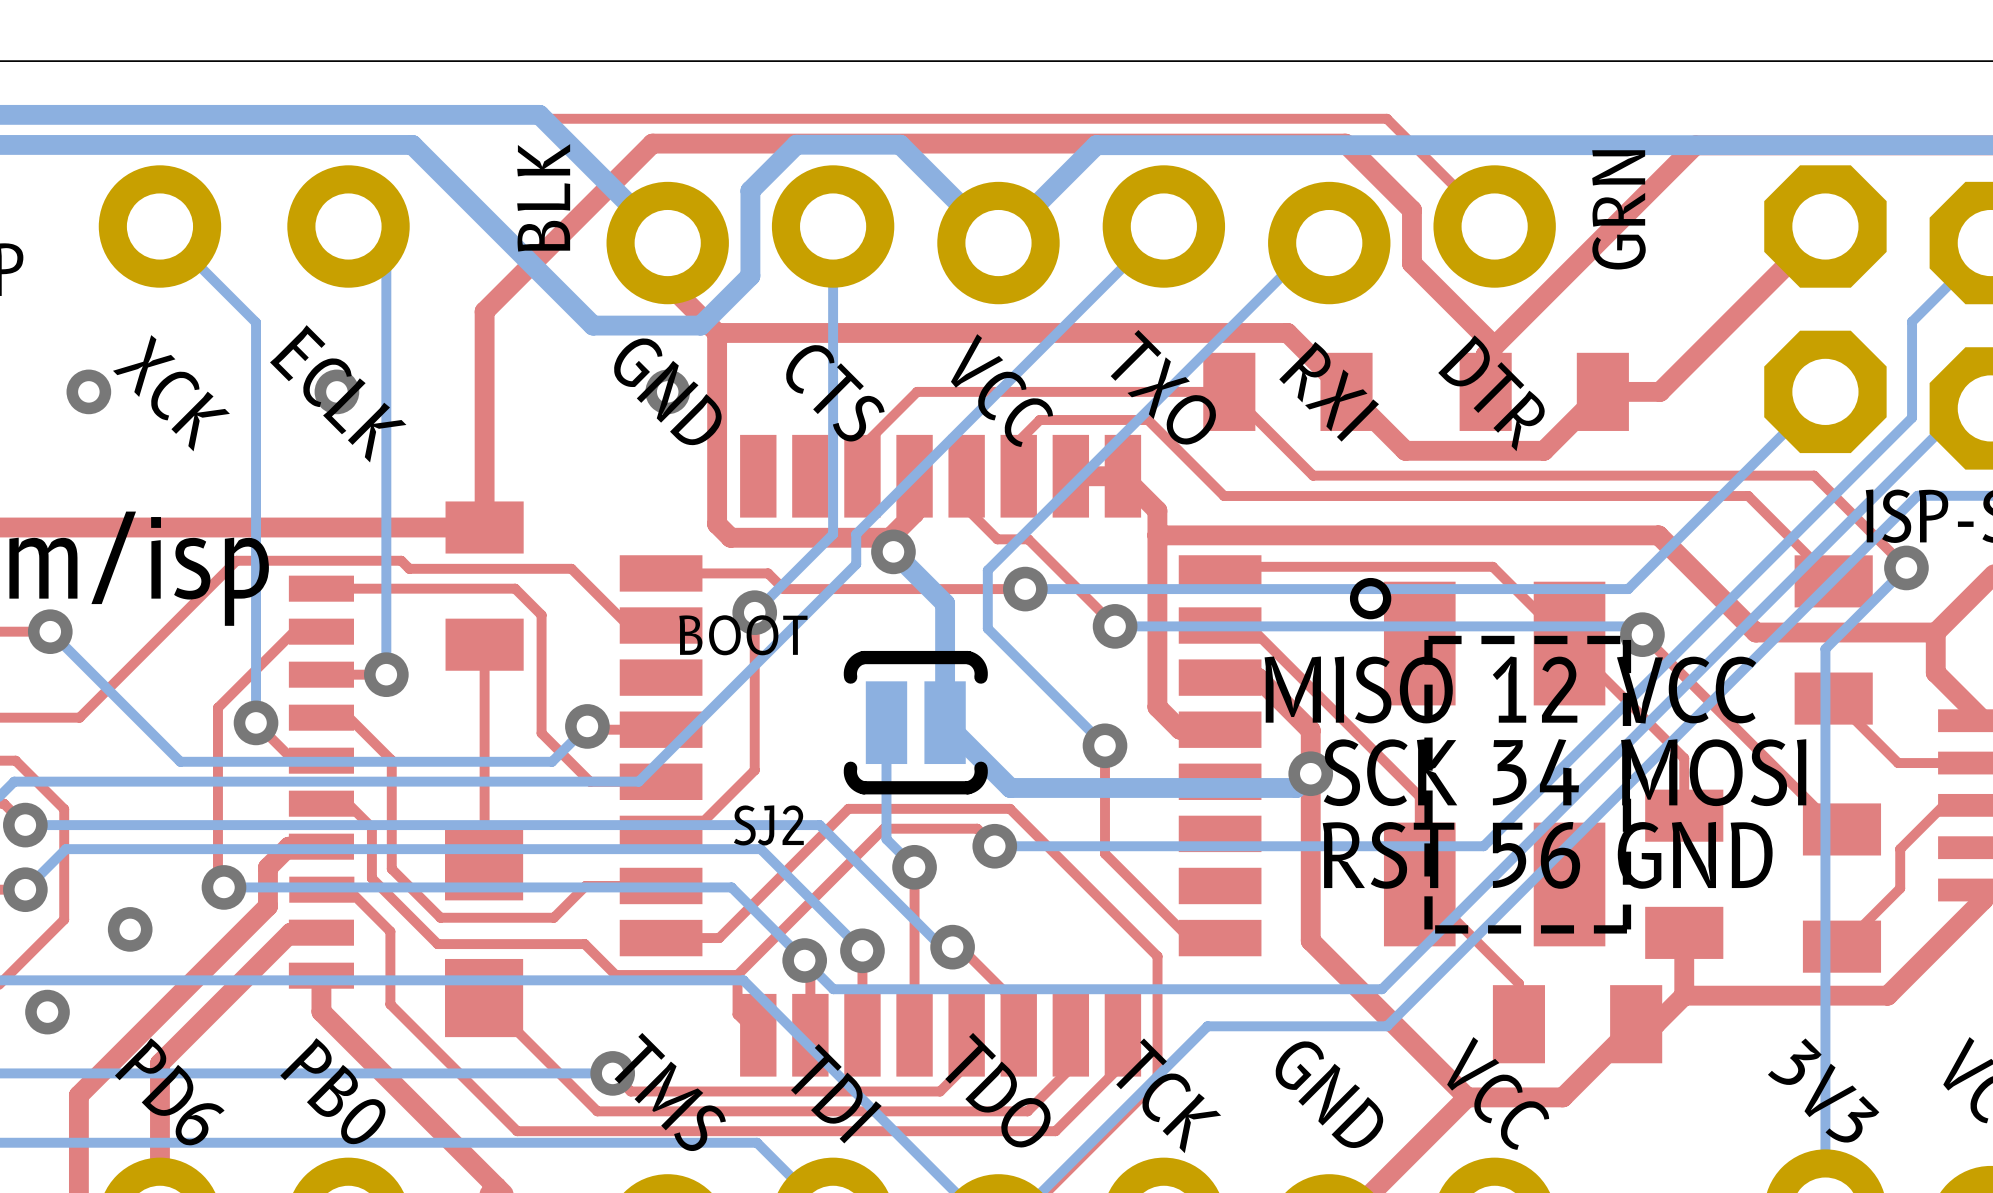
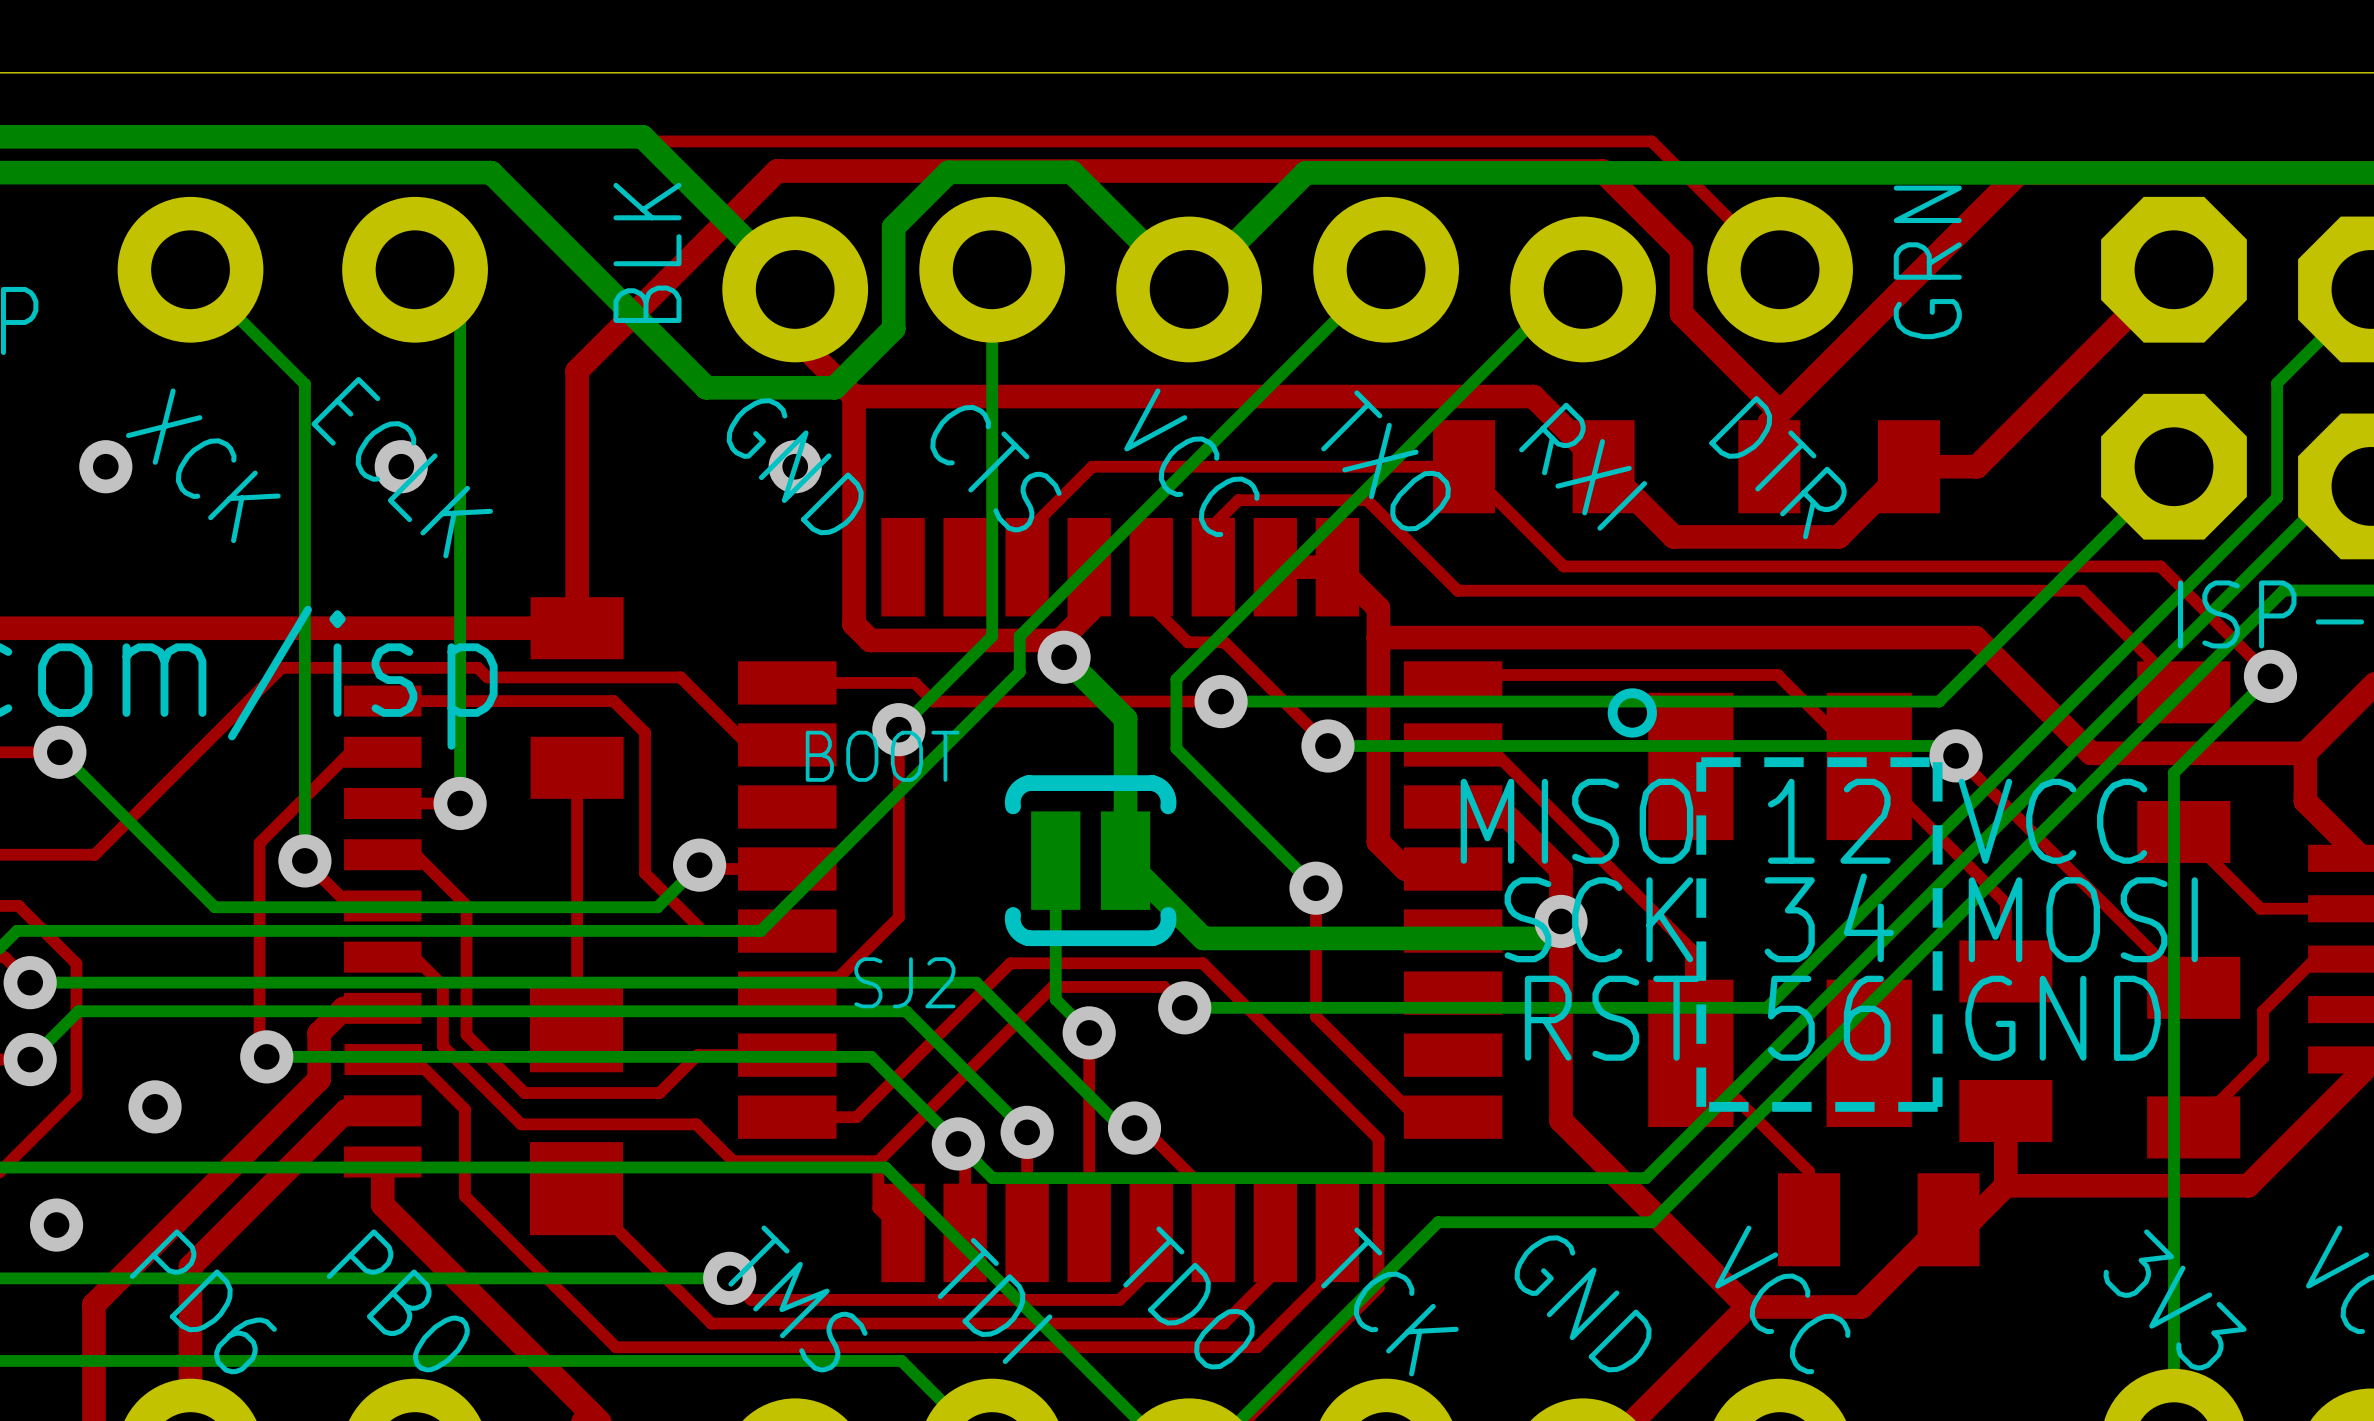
via position: (47, 1012) -> (56, 1225)

